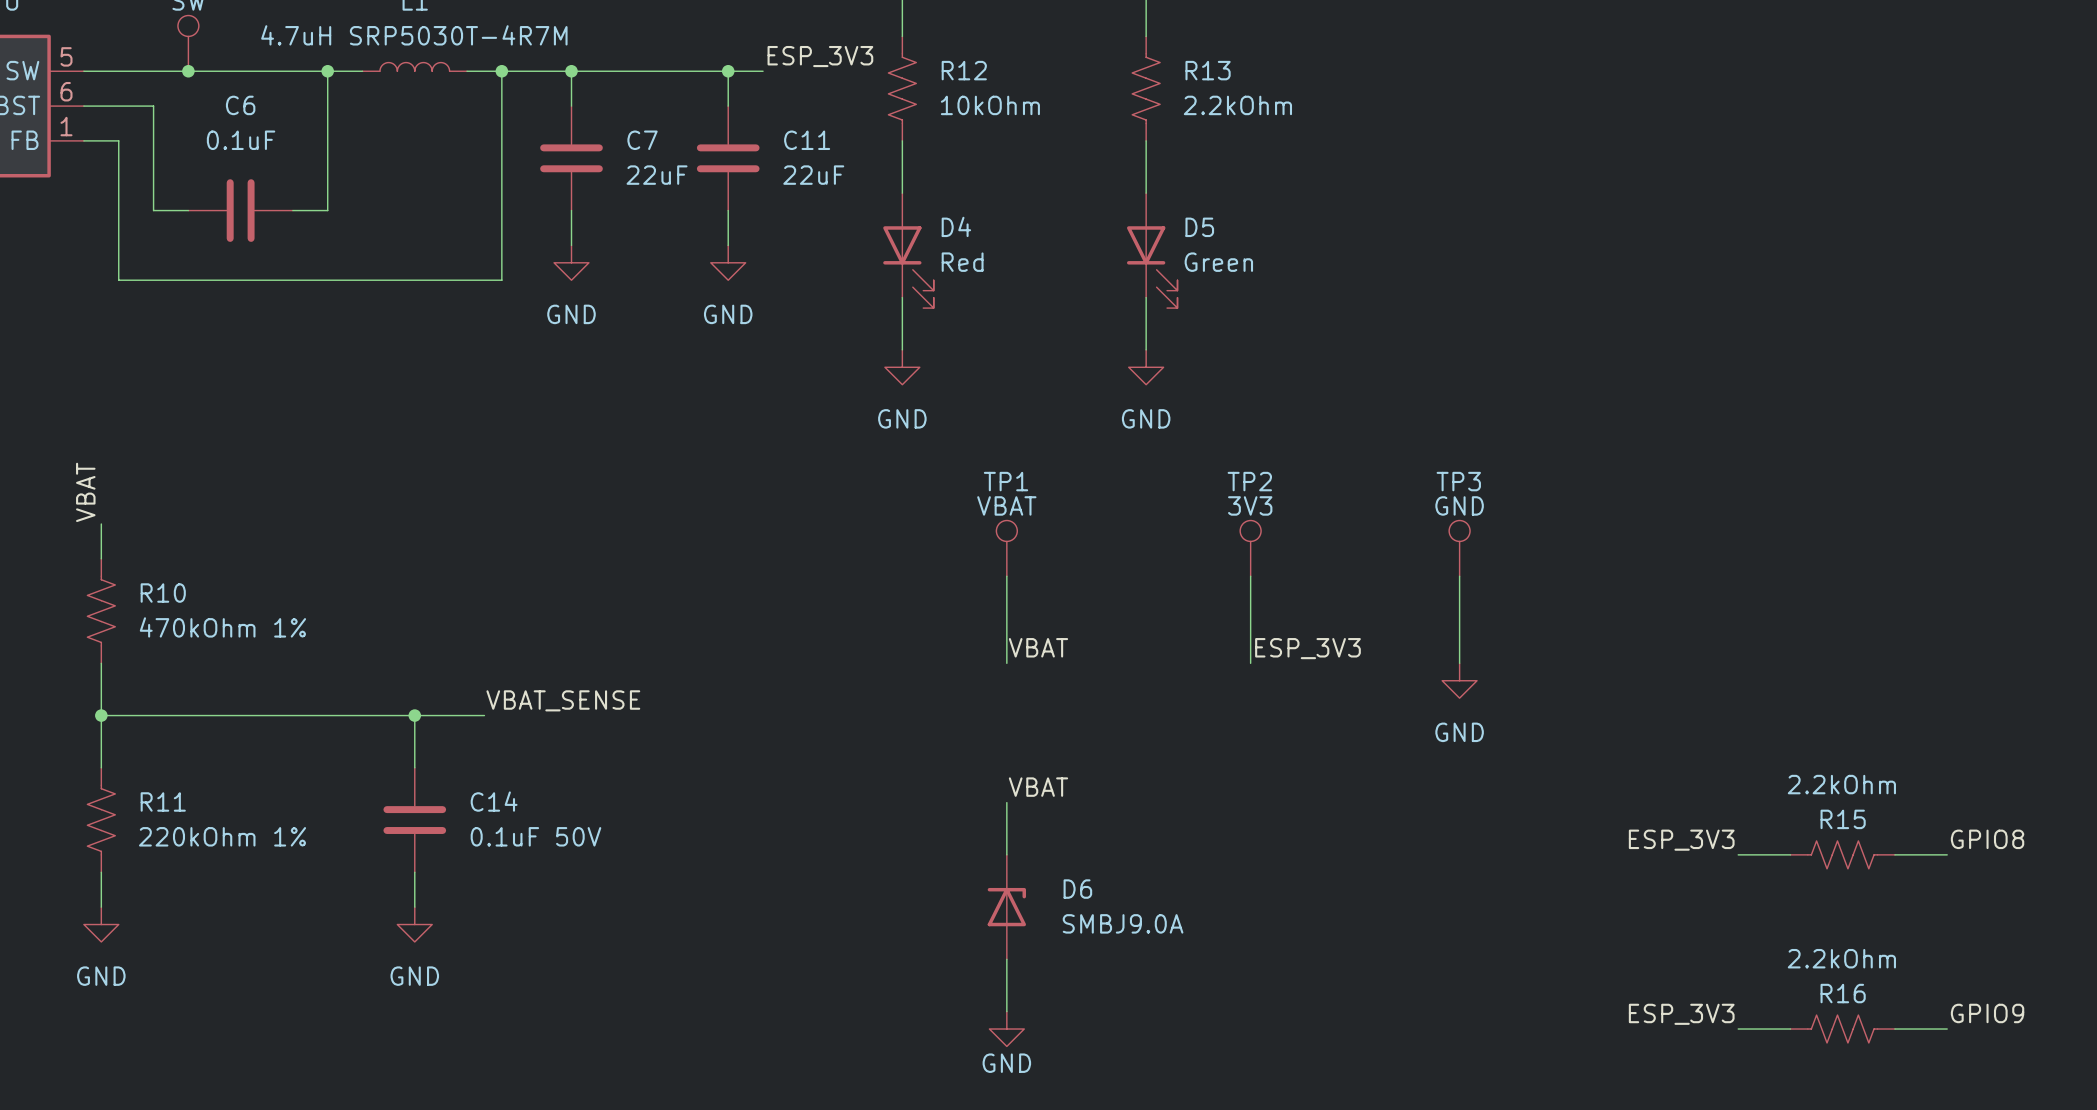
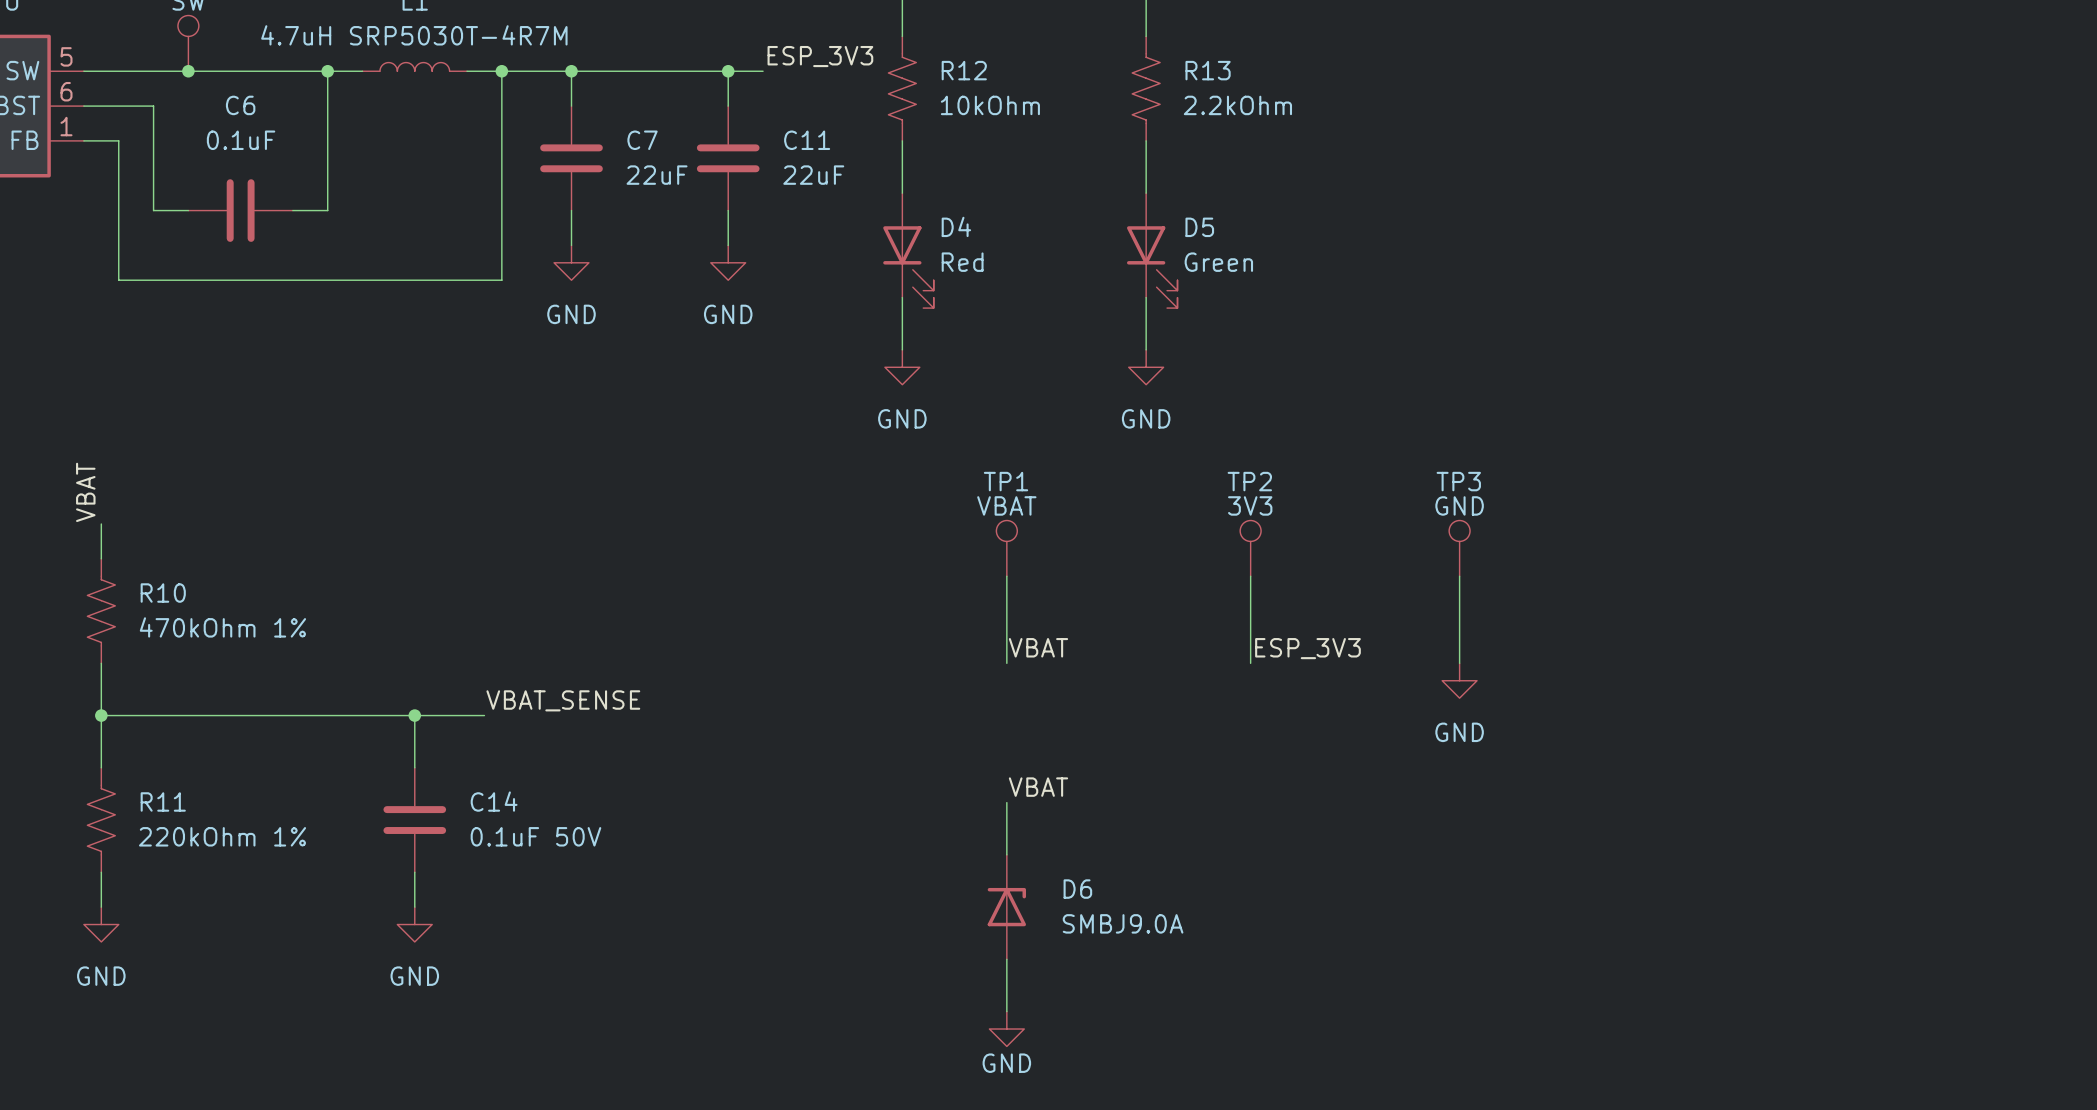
label: GPIO8 (1987, 839) -> none
label: ESP_3V3 (1681, 840) -> none
wire: (1738, 854) (1790, 854) -> none
R15: 2.2kOhm (1842, 854) -> none
wire: (1894, 854) (1947, 854) -> none
label: GPIO9 (1987, 1013) -> none
label: ESP_3V3 (1681, 1014) -> none
wire: (1738, 1029) (1790, 1029) -> none
R16: 2.2kOhm (1842, 1029) -> none
wire: (1894, 1029) (1947, 1029) -> none

